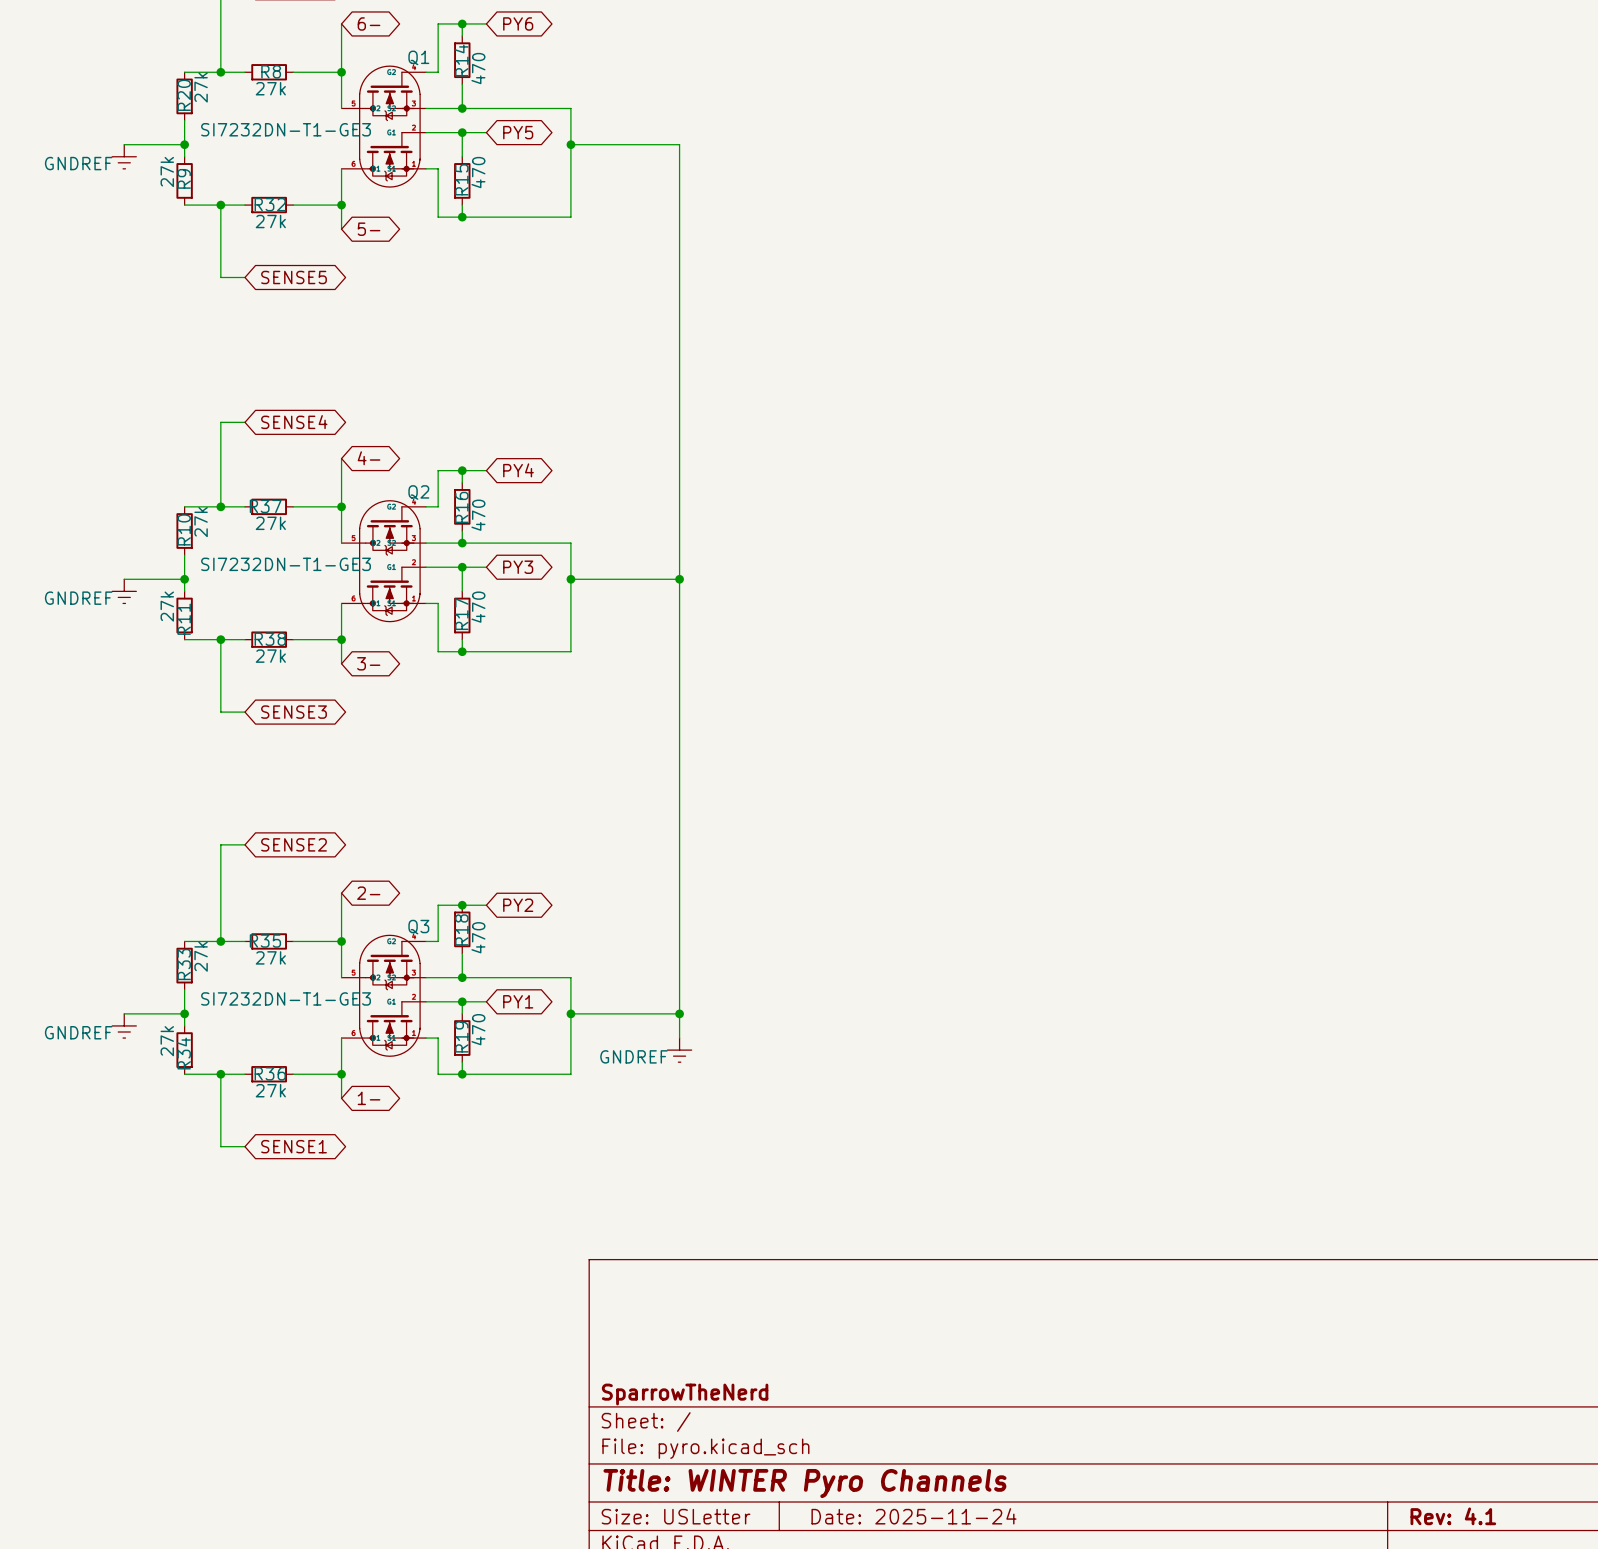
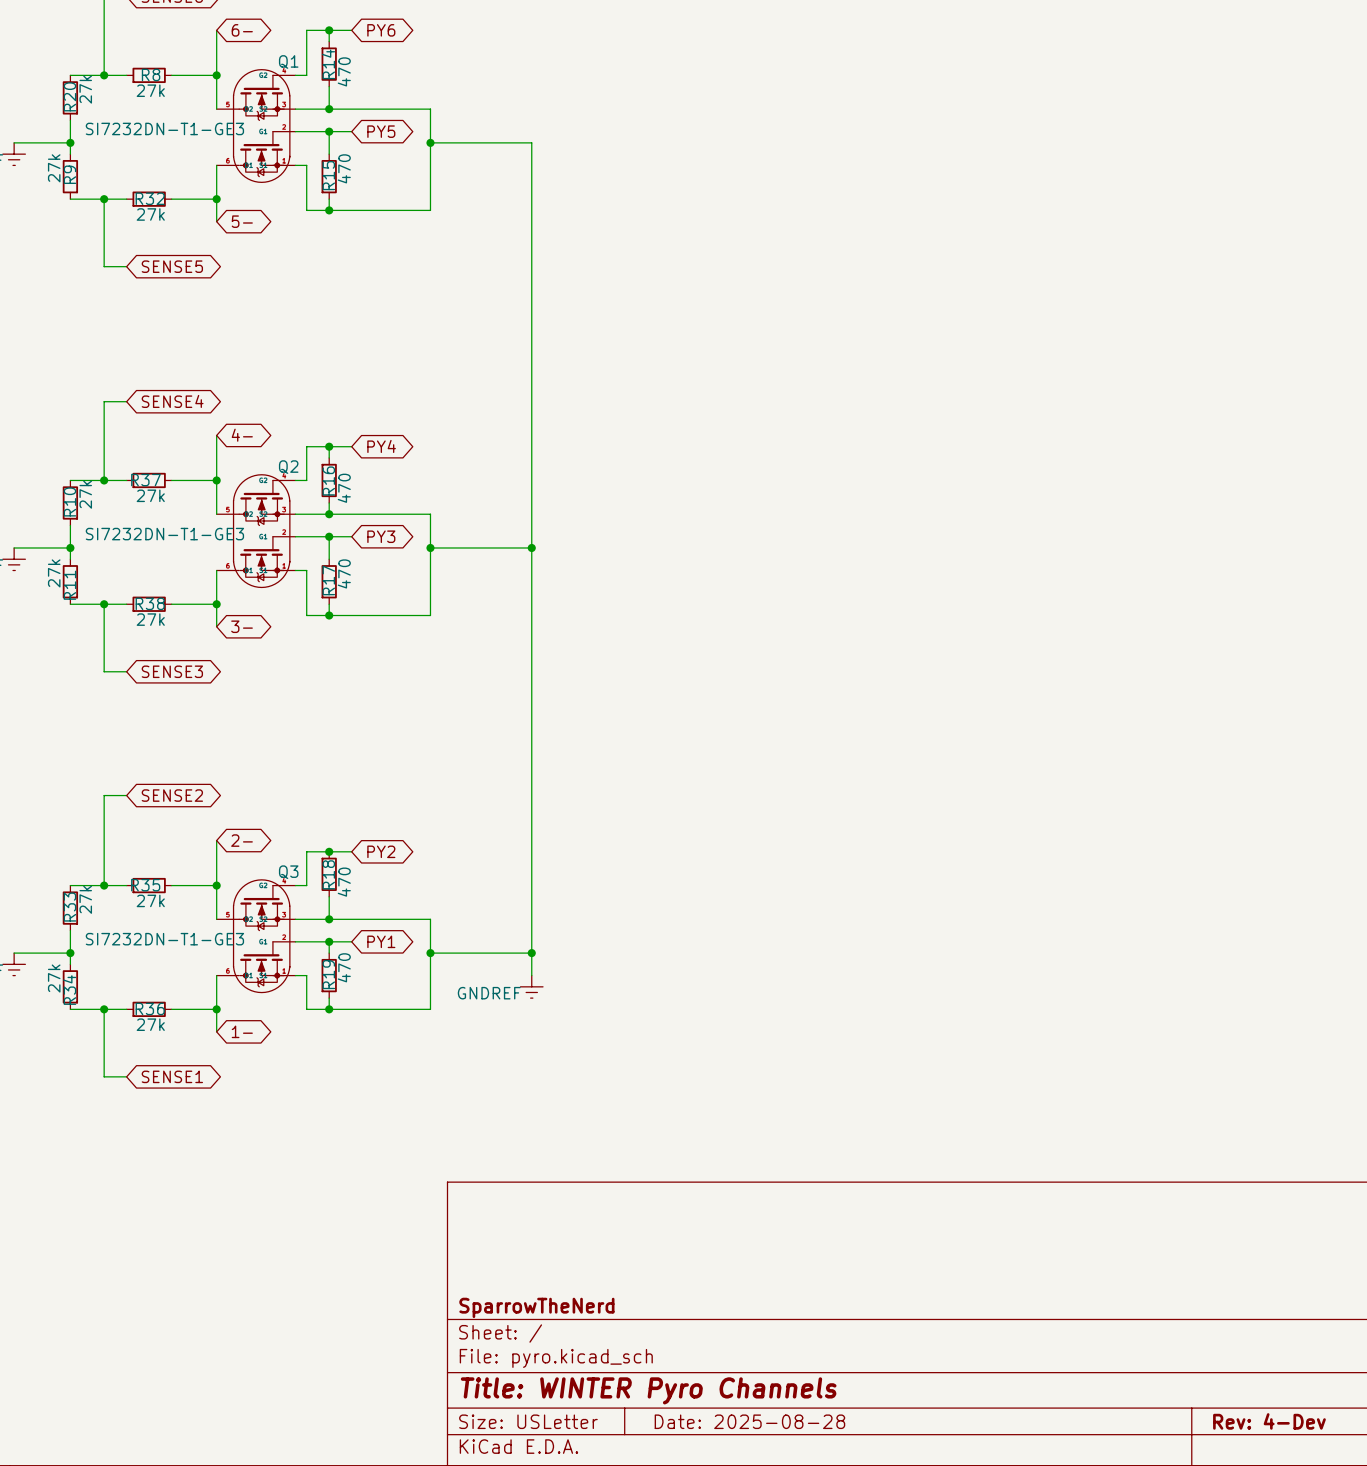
title block: Date: 2025-11-24 (914, 1516) -> Date: 2025-08-28 (749, 1421)
title block: Rev: 4.1 (1453, 1516) -> Rev: 4-Dev (1269, 1421)

